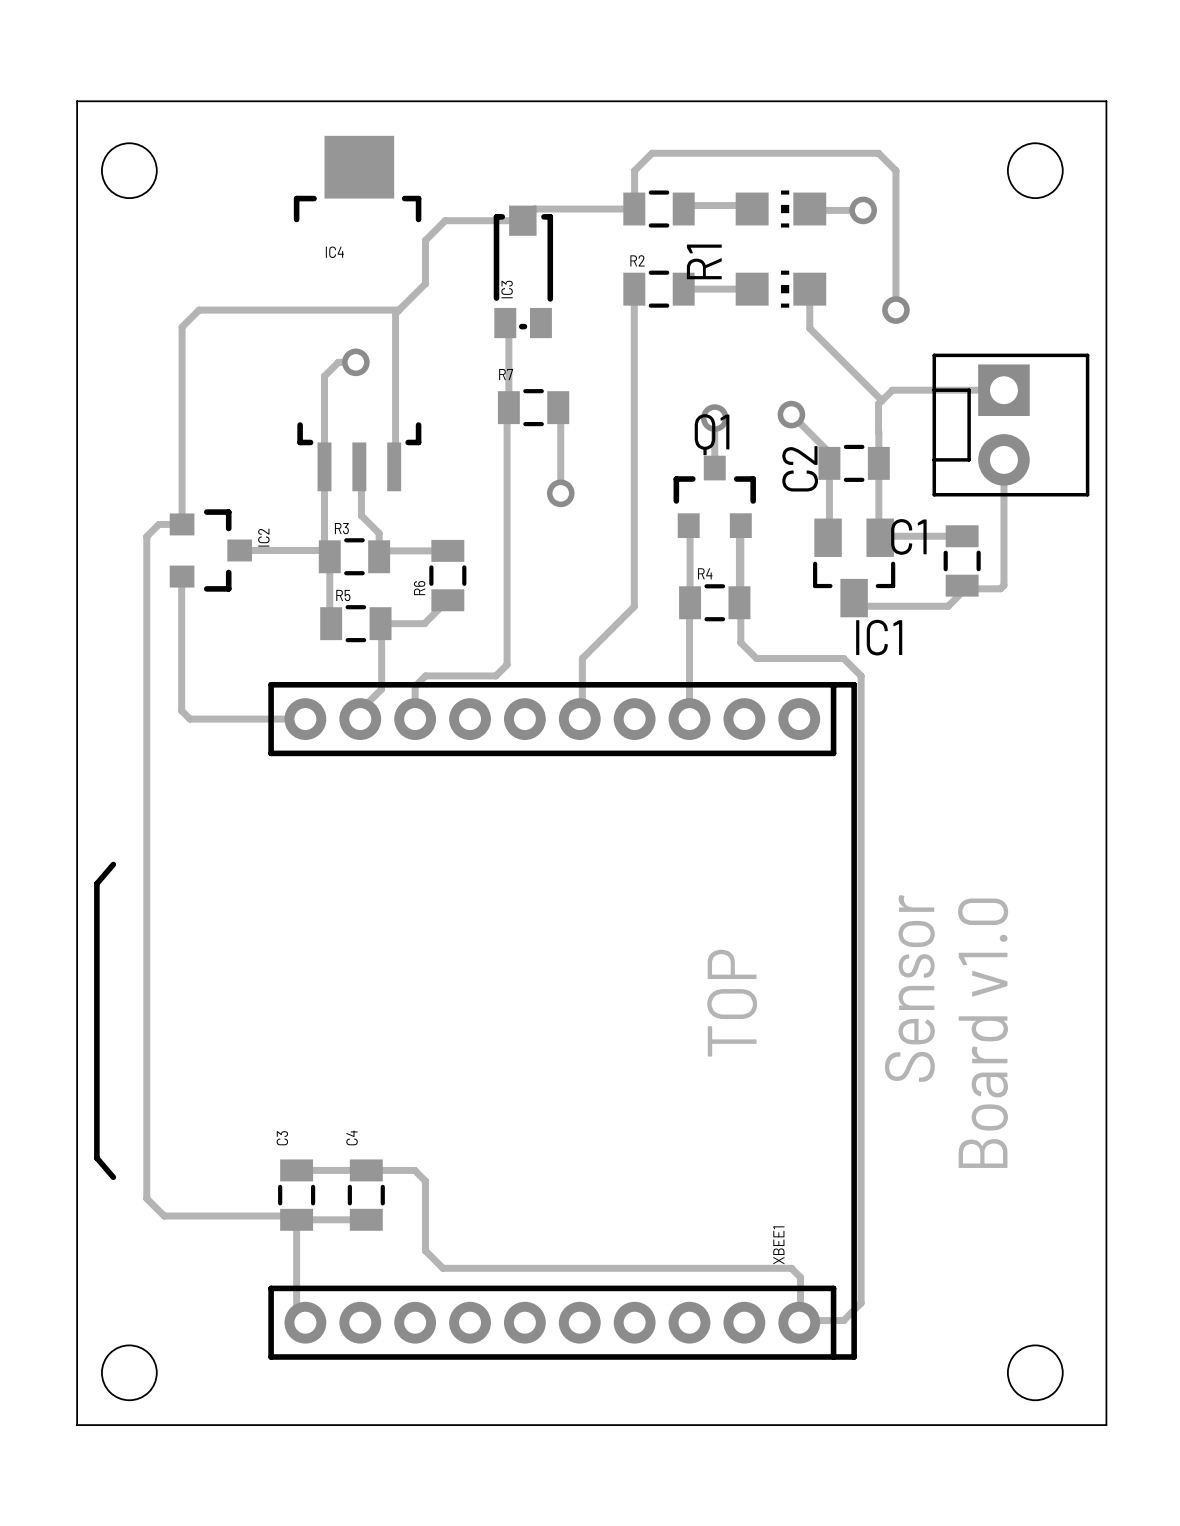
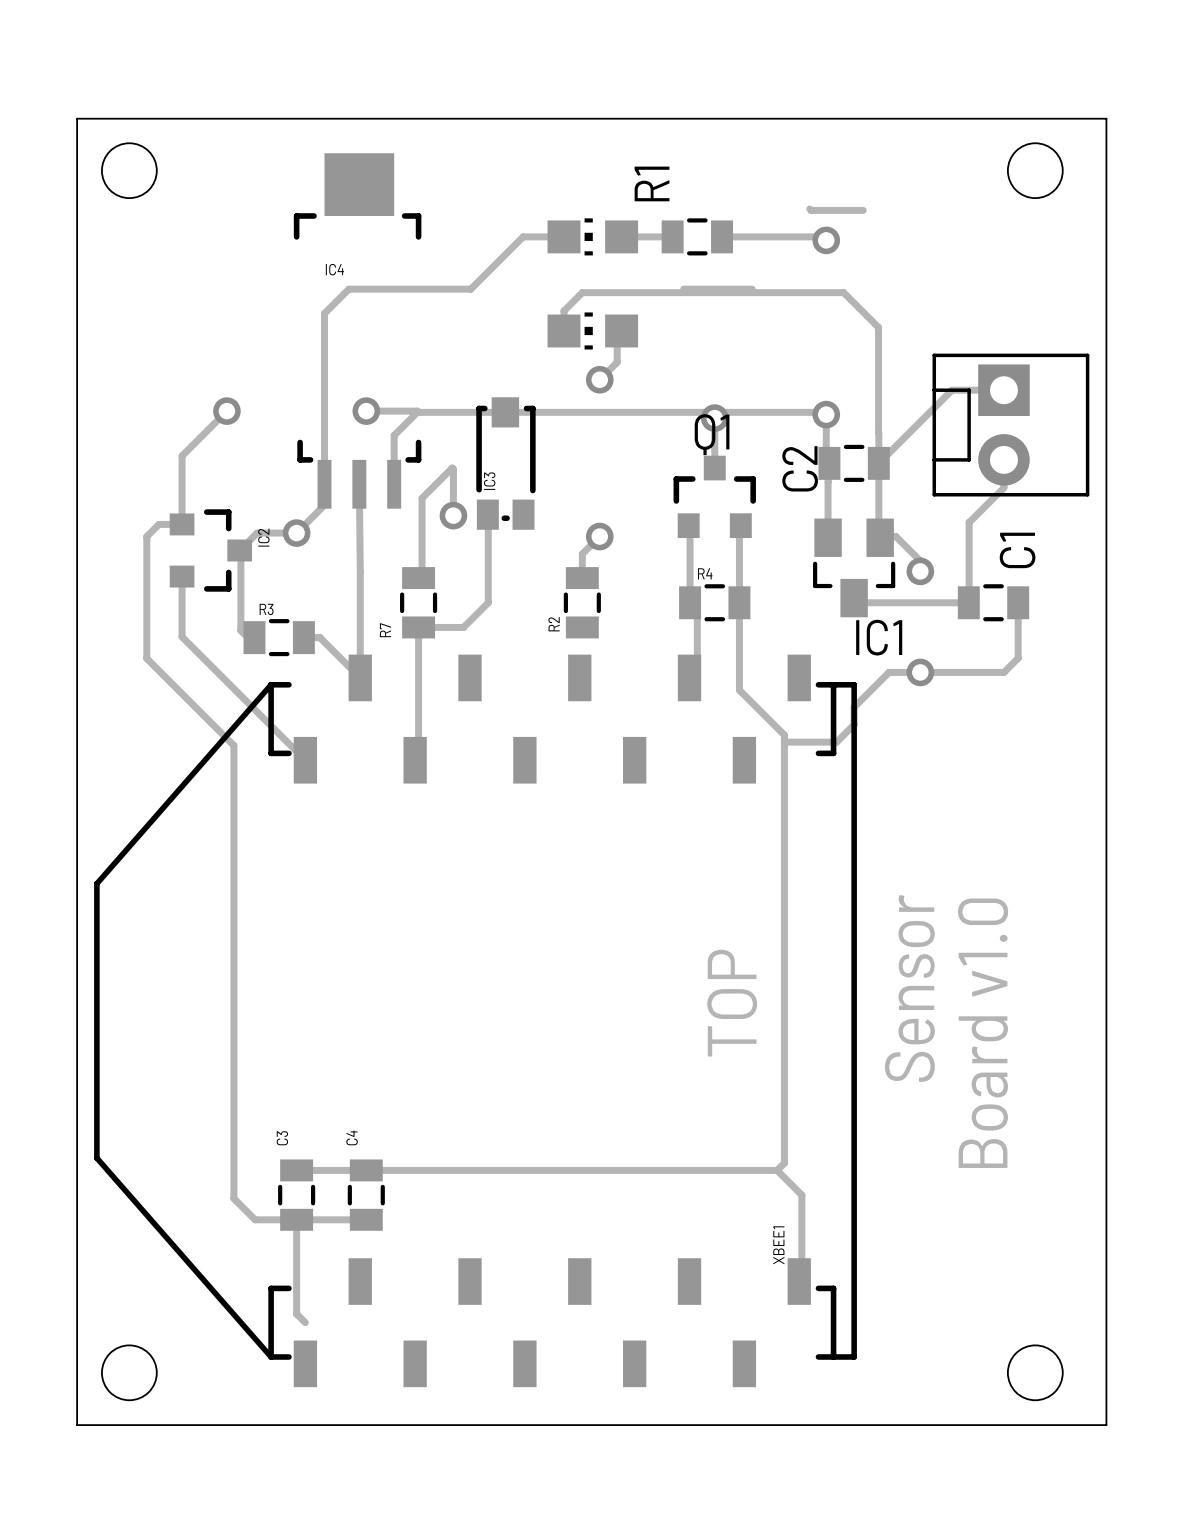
board edge: (77, 118) (77, 101) (1106, 101) (1106, 118) -> (77, 118) (1106, 118)
track: (634, 208) (634, 170) (652, 153) (878, 153) (895, 170) (895, 310) -> none
track: (634, 209) (534, 209) (522, 220) (445, 220) (425, 240) (425, 283) (395, 313) (394, 466) -> none
R1 position: (659, 209) -> (697, 236)
track: (683, 209) (687, 205) (739, 205) (742, 209) (752, 209) -> none
part: (780, 209) -> none
via position: (863, 210) -> (826, 240)
part: none -> (592, 236)
track: none -> (621, 236) (672, 236)
track: none -> (722, 236) (822, 236) (826, 240)
R1 name position: R1 (704, 261) -> R1 (652, 183)
IC3 position: (523, 271) -> (505, 463)
track: (634, 289) (634, 606) (582, 658) (582, 716) (579, 719) -> none
R2 rotation: 0° (659, 289) -> 90° clockwise (582, 602)
R2 position: (659, 289) -> (582, 602)
part: (780, 289) -> none
track: (809, 289) (809, 328) (882, 400) -> none
track: (399, 310) (199, 310) (182, 327) (182, 455) -> (226, 411) (182, 455)
via: (895, 310) -> none
IC4 position: (357, 313) -> (357, 330)
track: (505, 323) (508, 326) (507, 664) (495, 675) (425, 675) (415, 686) (415, 719) -> none
track: none -> (563, 330) (563, 311) (582, 292) (843, 292) (878, 327) (878, 404)
part: none -> (592, 330)
track: none -> (617, 335) (617, 362) (599, 379)
track: (355, 362) (338, 362) (324, 376) -> (563, 236) (523, 236) (470, 289) (348, 289) (324, 313) (324, 376)
via position: (355, 362) -> (366, 411)
R7 name position: R7 (506, 374) -> R7 (385, 630)
via: none -> (599, 379)
track: (952, 390) (892, 390) (878, 404) -> (952, 390) (878, 463)
R7 rotation: 0° (533, 407) -> 90° clockwise (418, 602)
R7 position: (533, 407) -> (418, 602)
track: (558, 407) (560, 410) (560, 493) -> none
via: none -> (226, 411)
track: none -> (366, 411) (418, 412)
track: (791, 414) (829, 452) (828, 537) -> (394, 484) (394, 435) (417, 412) (824, 412) (826, 414) (826, 460) (829, 463) (828, 537)
via position: (791, 414) -> (826, 414)
track: (359, 466) (361, 468) (361, 515) (379, 533) (379, 556) (385, 550) (447, 550) -> none
track: none -> (359, 484) (360, 677) (319, 637) (303, 637)
track: (1003, 487) (1003, 585) (1000, 588) (965, 588) (962, 585) (962, 592) (948, 606) (862, 606) (858, 602) -> (1003, 487) (969, 522) (969, 602)
via: (560, 493) -> none
track: (324, 505) (324, 551) -> (324, 505) (296, 533) (257, 533) (239, 550) (240, 630) (247, 637) (254, 637)
track: none -> (487, 514) (488, 602) (463, 627) (418, 627) (418, 756) (415, 760)
track: none -> (453, 515) (452, 468) (422, 498) (422, 574) (418, 578)
via: none -> (453, 515)
track: (740, 525) (740, 642) (756, 658) (843, 658) (861, 675) (861, 1303) (843, 1320) (801, 1320) (799, 1322) -> none
via: none -> (296, 533)
track: none -> (599, 536) (582, 553) (582, 578)
via: none -> (599, 536)
track: (881, 536) (962, 536) -> (881, 536) (895, 536) (920, 560) (920, 571)
track: (239, 550) (323, 550) (329, 556) (331, 623) -> none
R3 position: (354, 556) -> (279, 637)
C1 rotation: 0° (962, 560) -> 90° clockwise (993, 602)
C1 position: (962, 560) -> (993, 602)
via: none -> (920, 571)
R6: (447, 575) -> none
track: (182, 576) (181, 710) (189, 719) (305, 719) -> (182, 576) (182, 636) (305, 760)
track: none -> (976, 595) (968, 602) (858, 602)
track: none -> (1023, 597) (1018, 602) (1018, 658) (1003, 672) (888, 672) (854, 707) (854, 724) (836, 742) (784, 742)
track: (447, 600) (424, 623) (380, 623) (381, 689) (360, 710) (360, 719) -> none
track: (690, 602) (689, 719) -> (690, 602) (697, 610) (697, 672) (689, 677)
track: none -> (739, 602) (739, 690) (784, 735) (784, 1163) (777, 1170)
R5: (355, 623) -> none
track: (146, 658) (146, 1198) (164, 1216) (292, 1216) (296, 1219) -> (146, 658) (233, 745) (233, 1198) (255, 1219) (296, 1219)
via: none -> (920, 672)
XBEE1 footprint: [94, 682, 857, 1360] -> [94, 654, 857, 1388]
track: (414, 1170) (425, 1181) (425, 1250) (442, 1268) (791, 1268) (800, 1277) (800, 1321) -> (414, 1170) (777, 1170)
track: none -> (777, 1170) (801, 1195) (801, 1278) (799, 1281)

